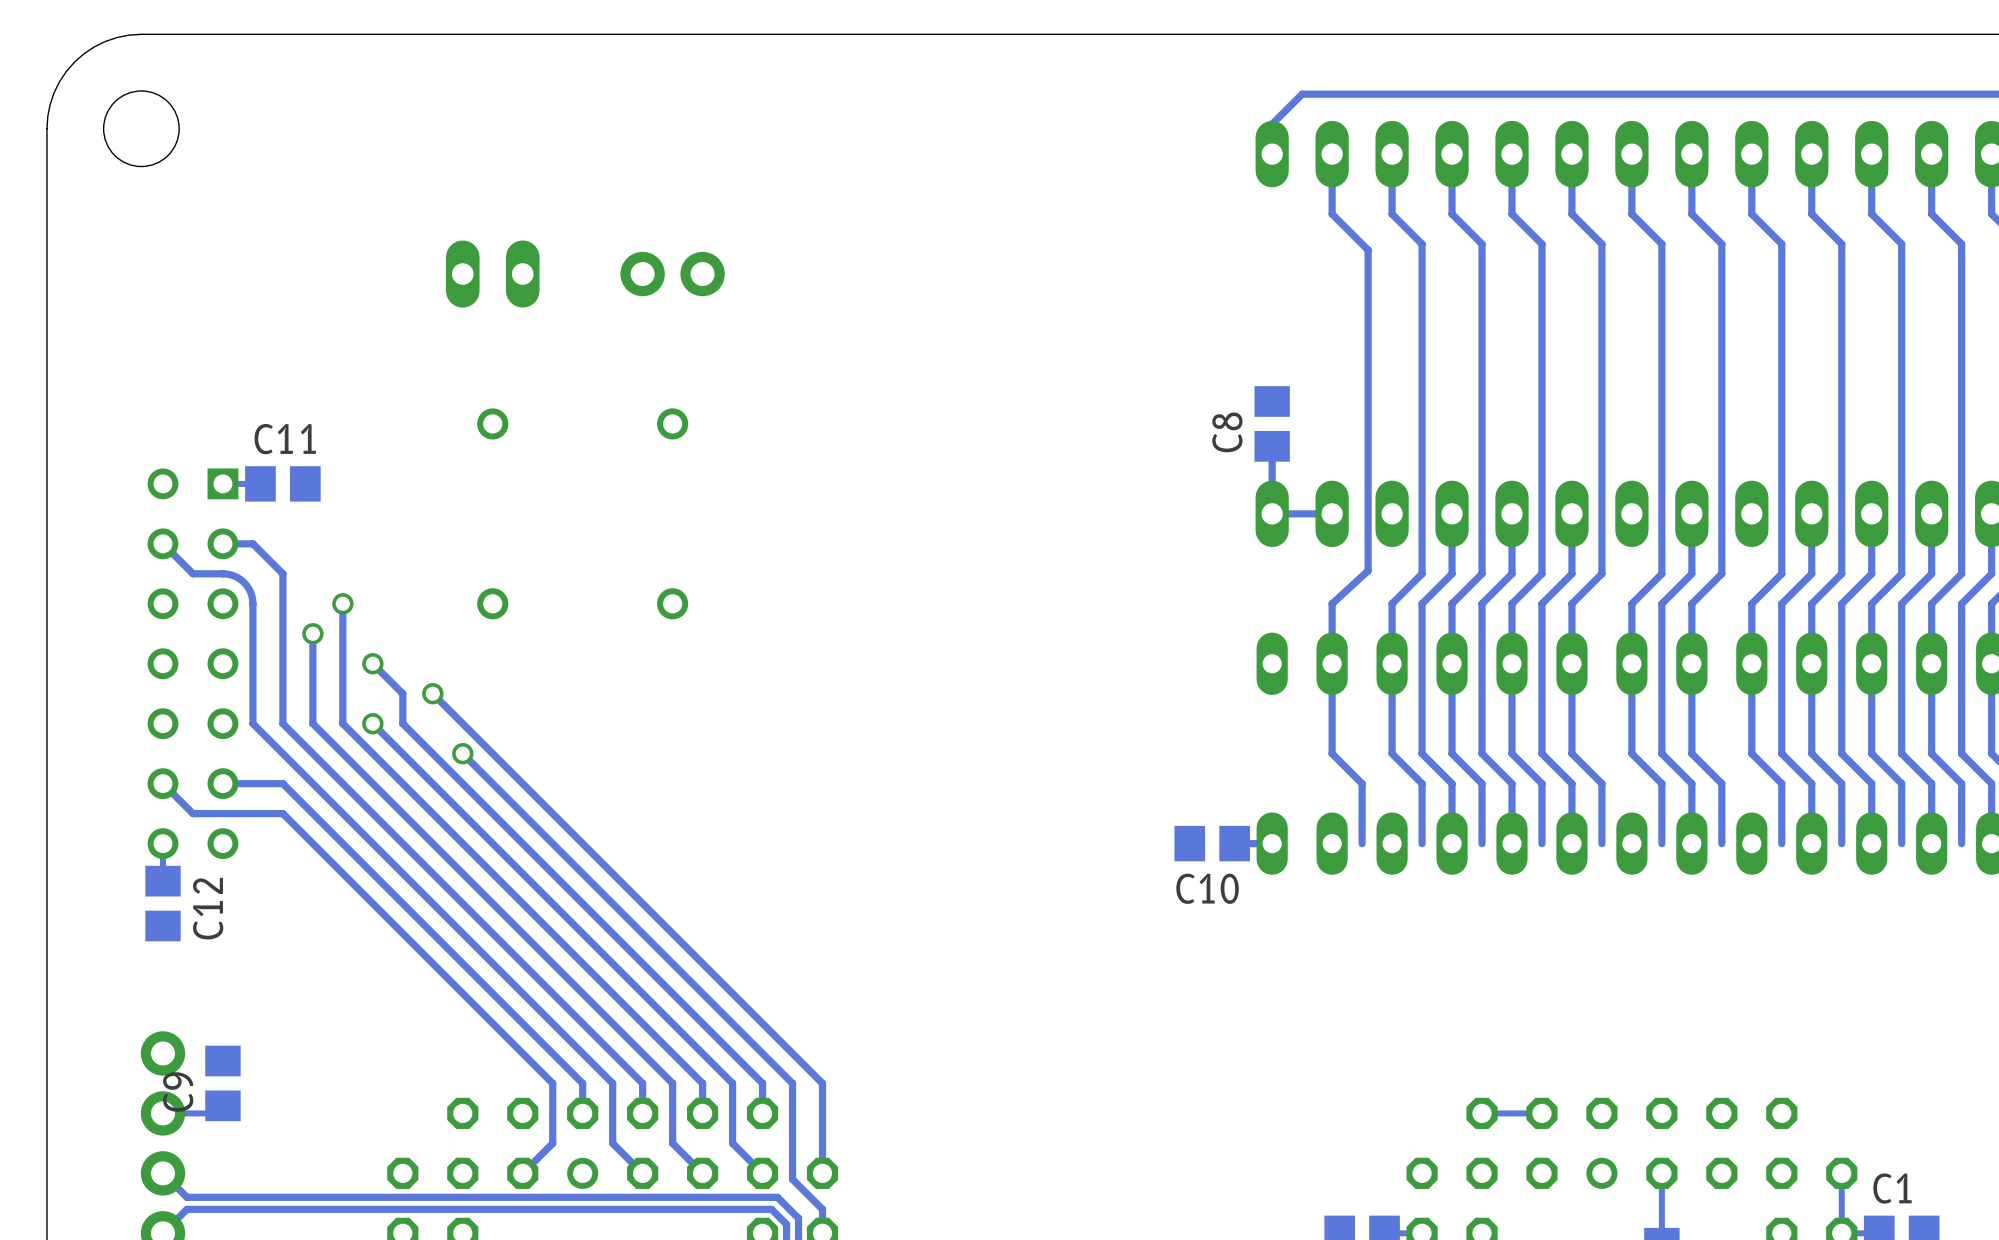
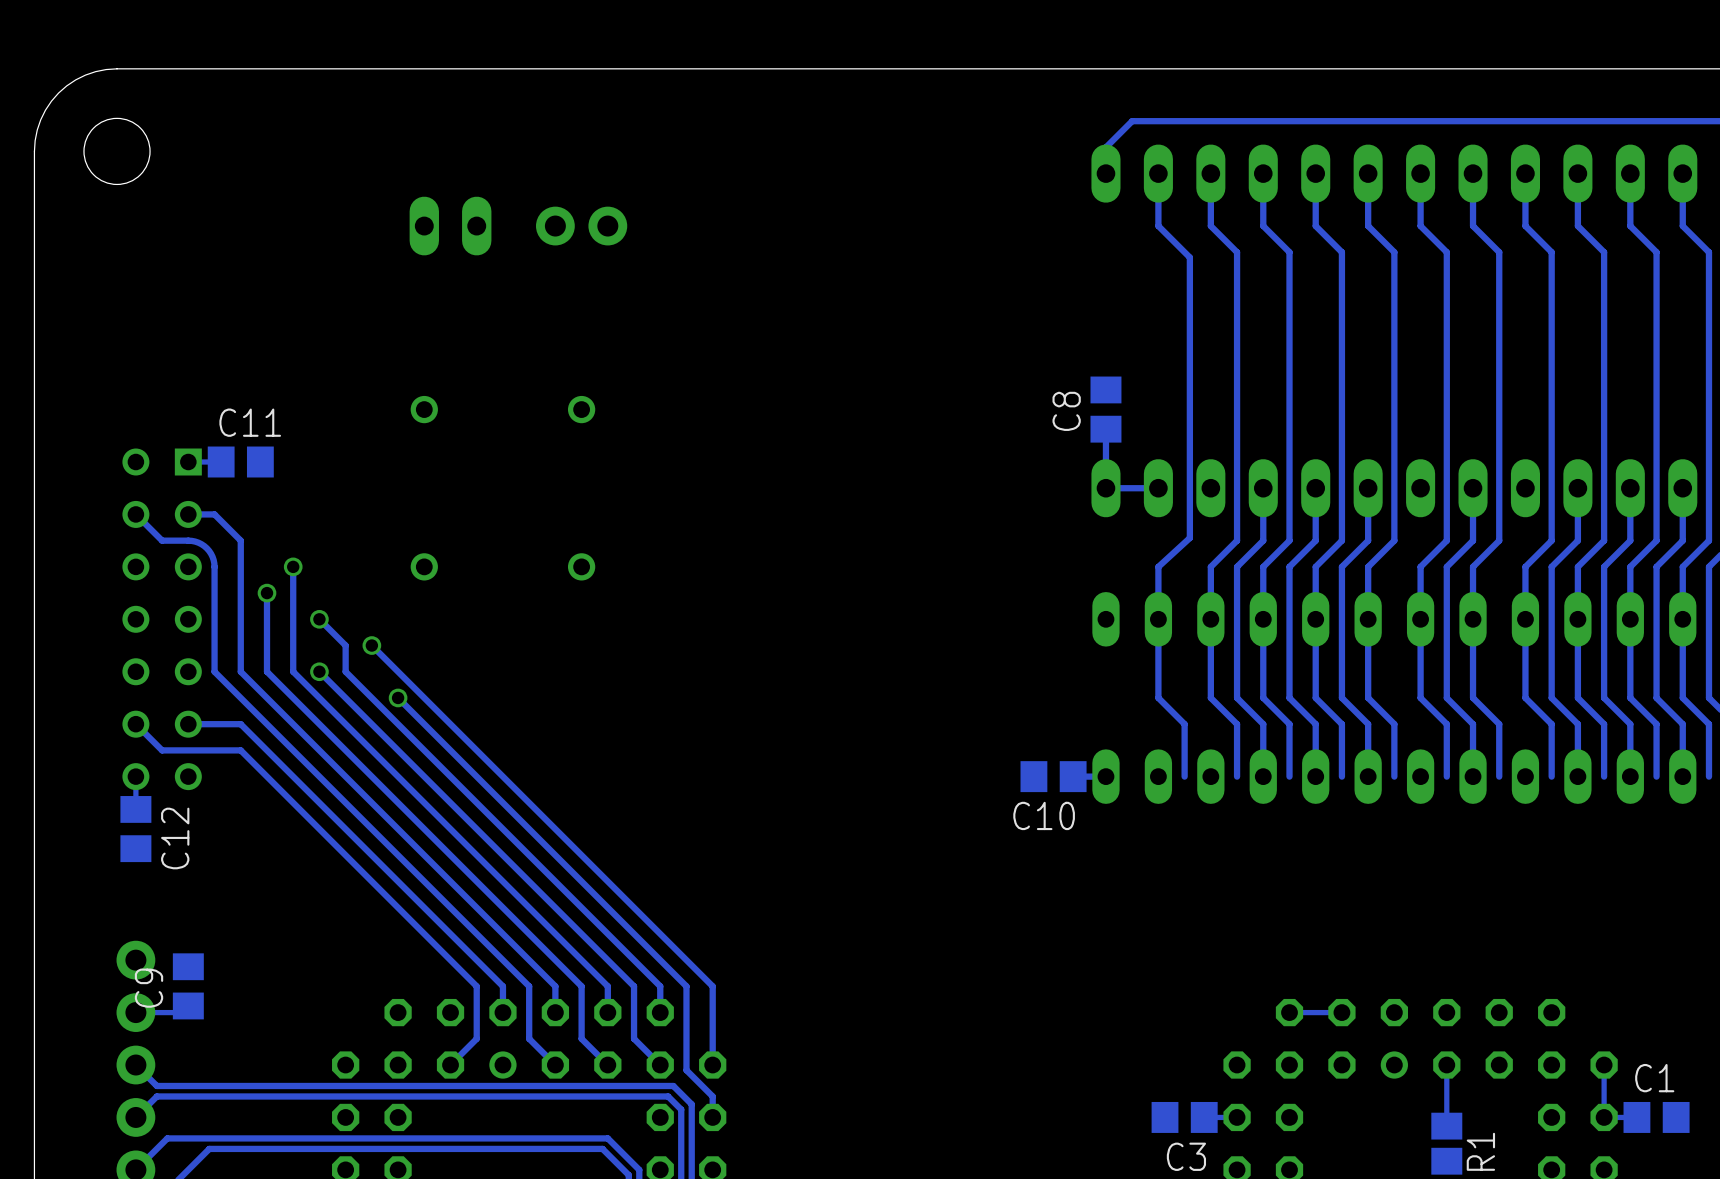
part position: (492, 274) -> (450, 226)
part position: (672, 274) -> (581, 226)

